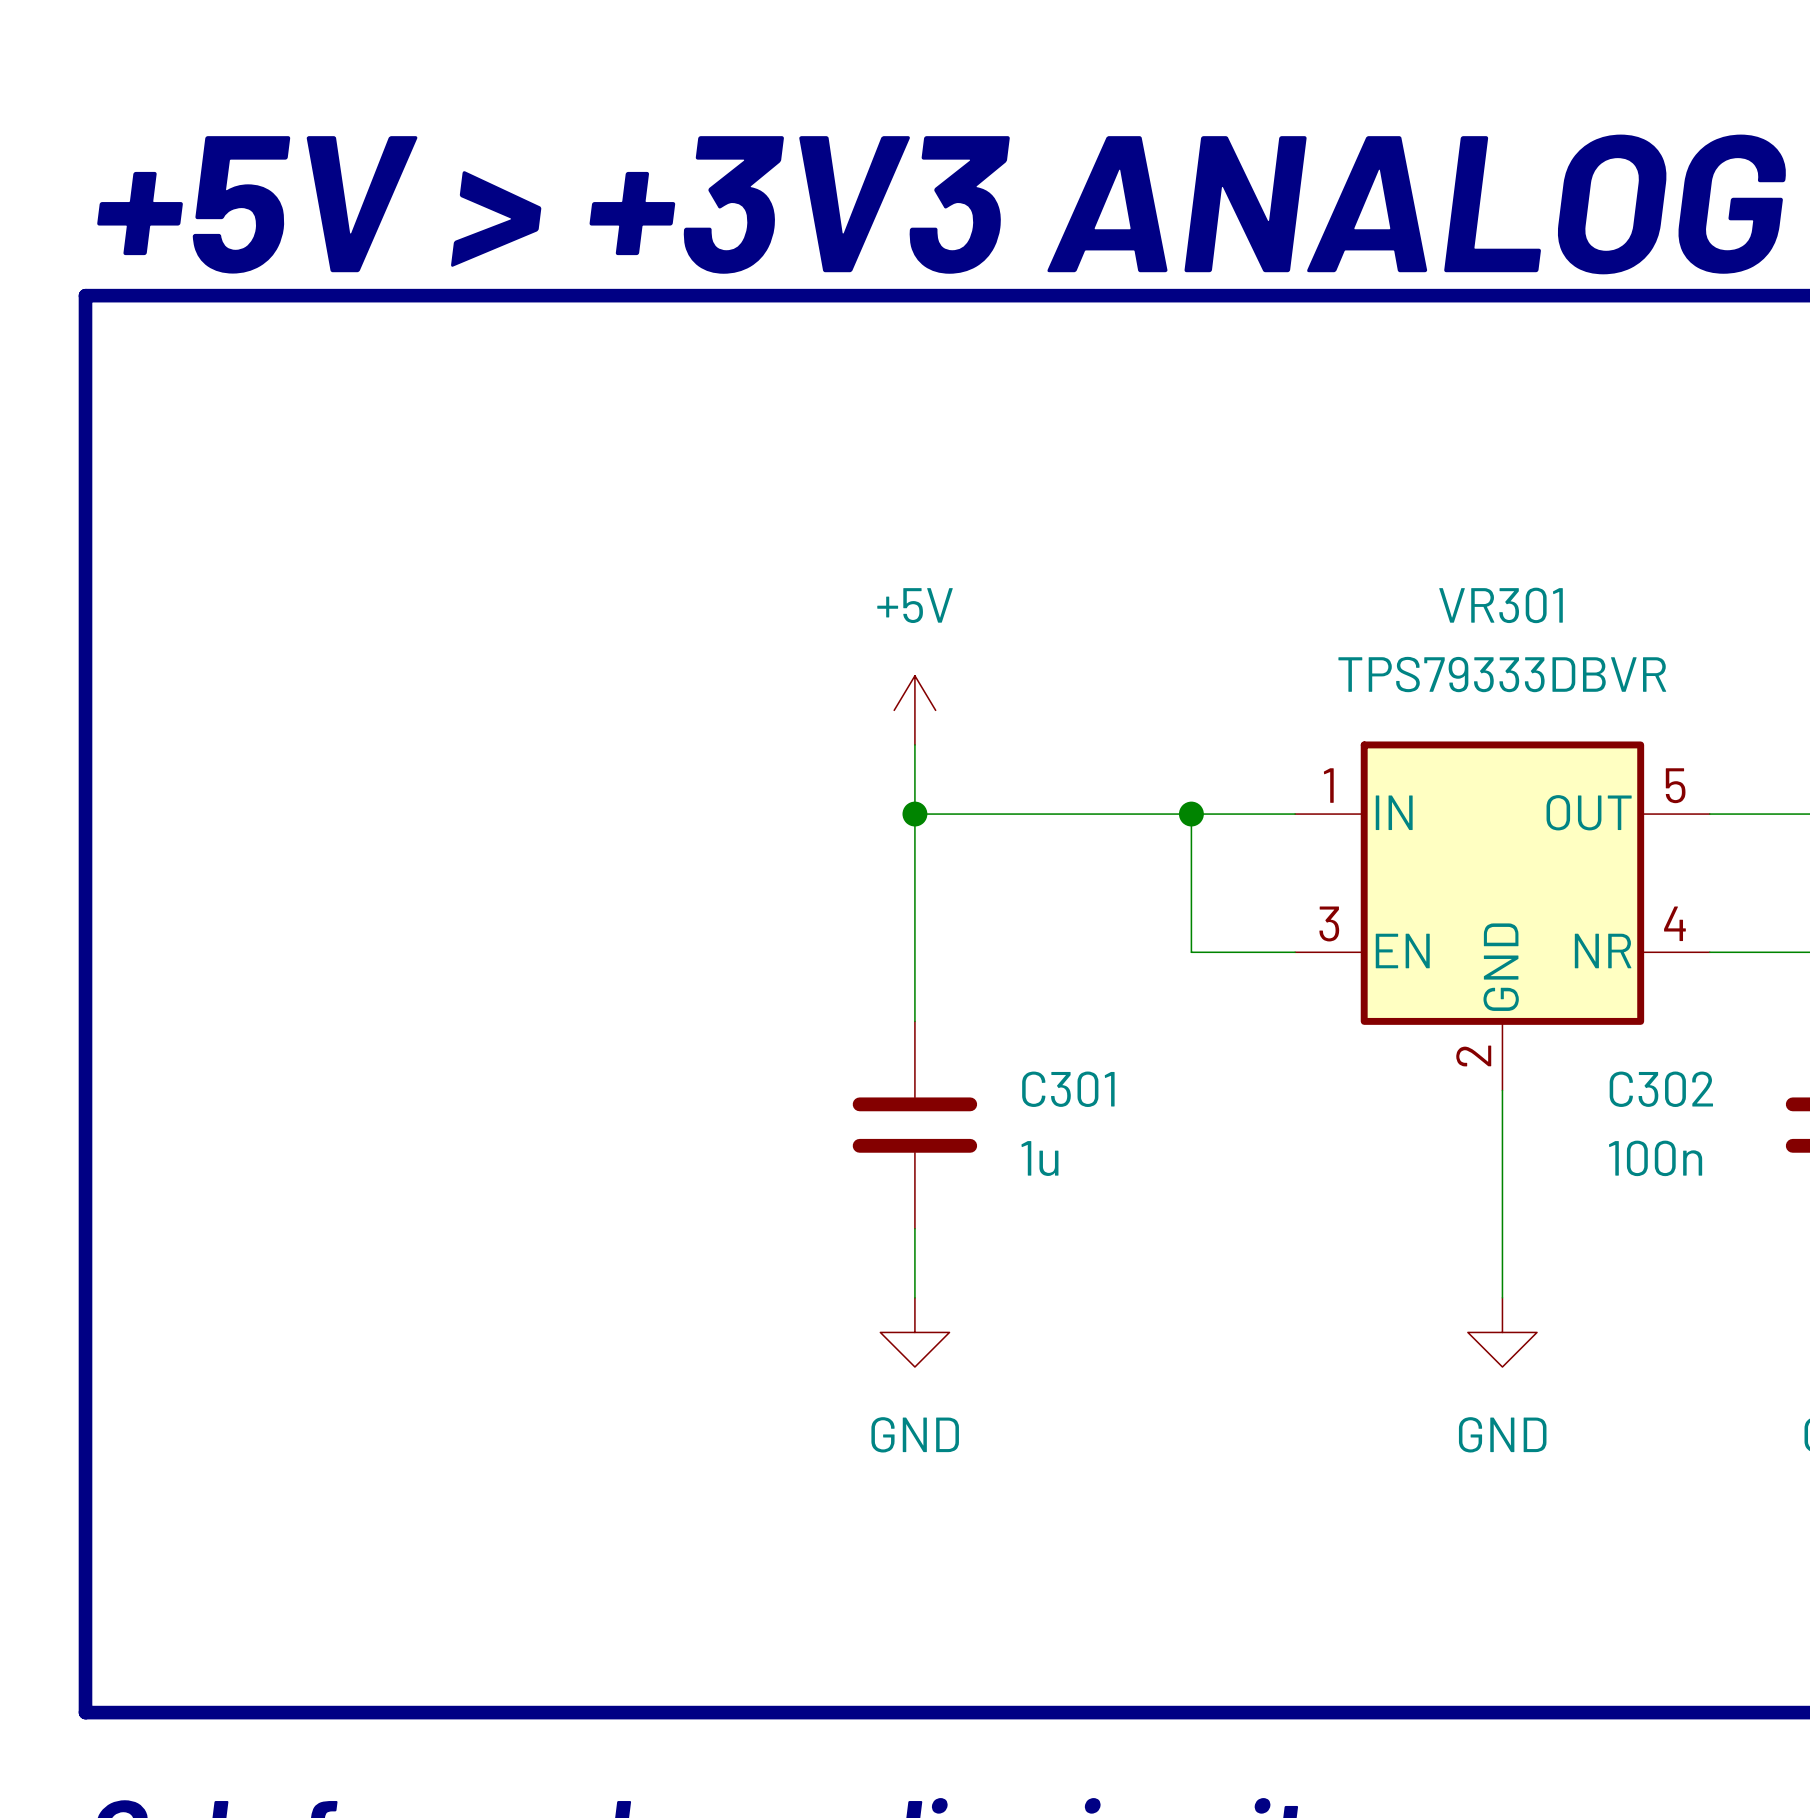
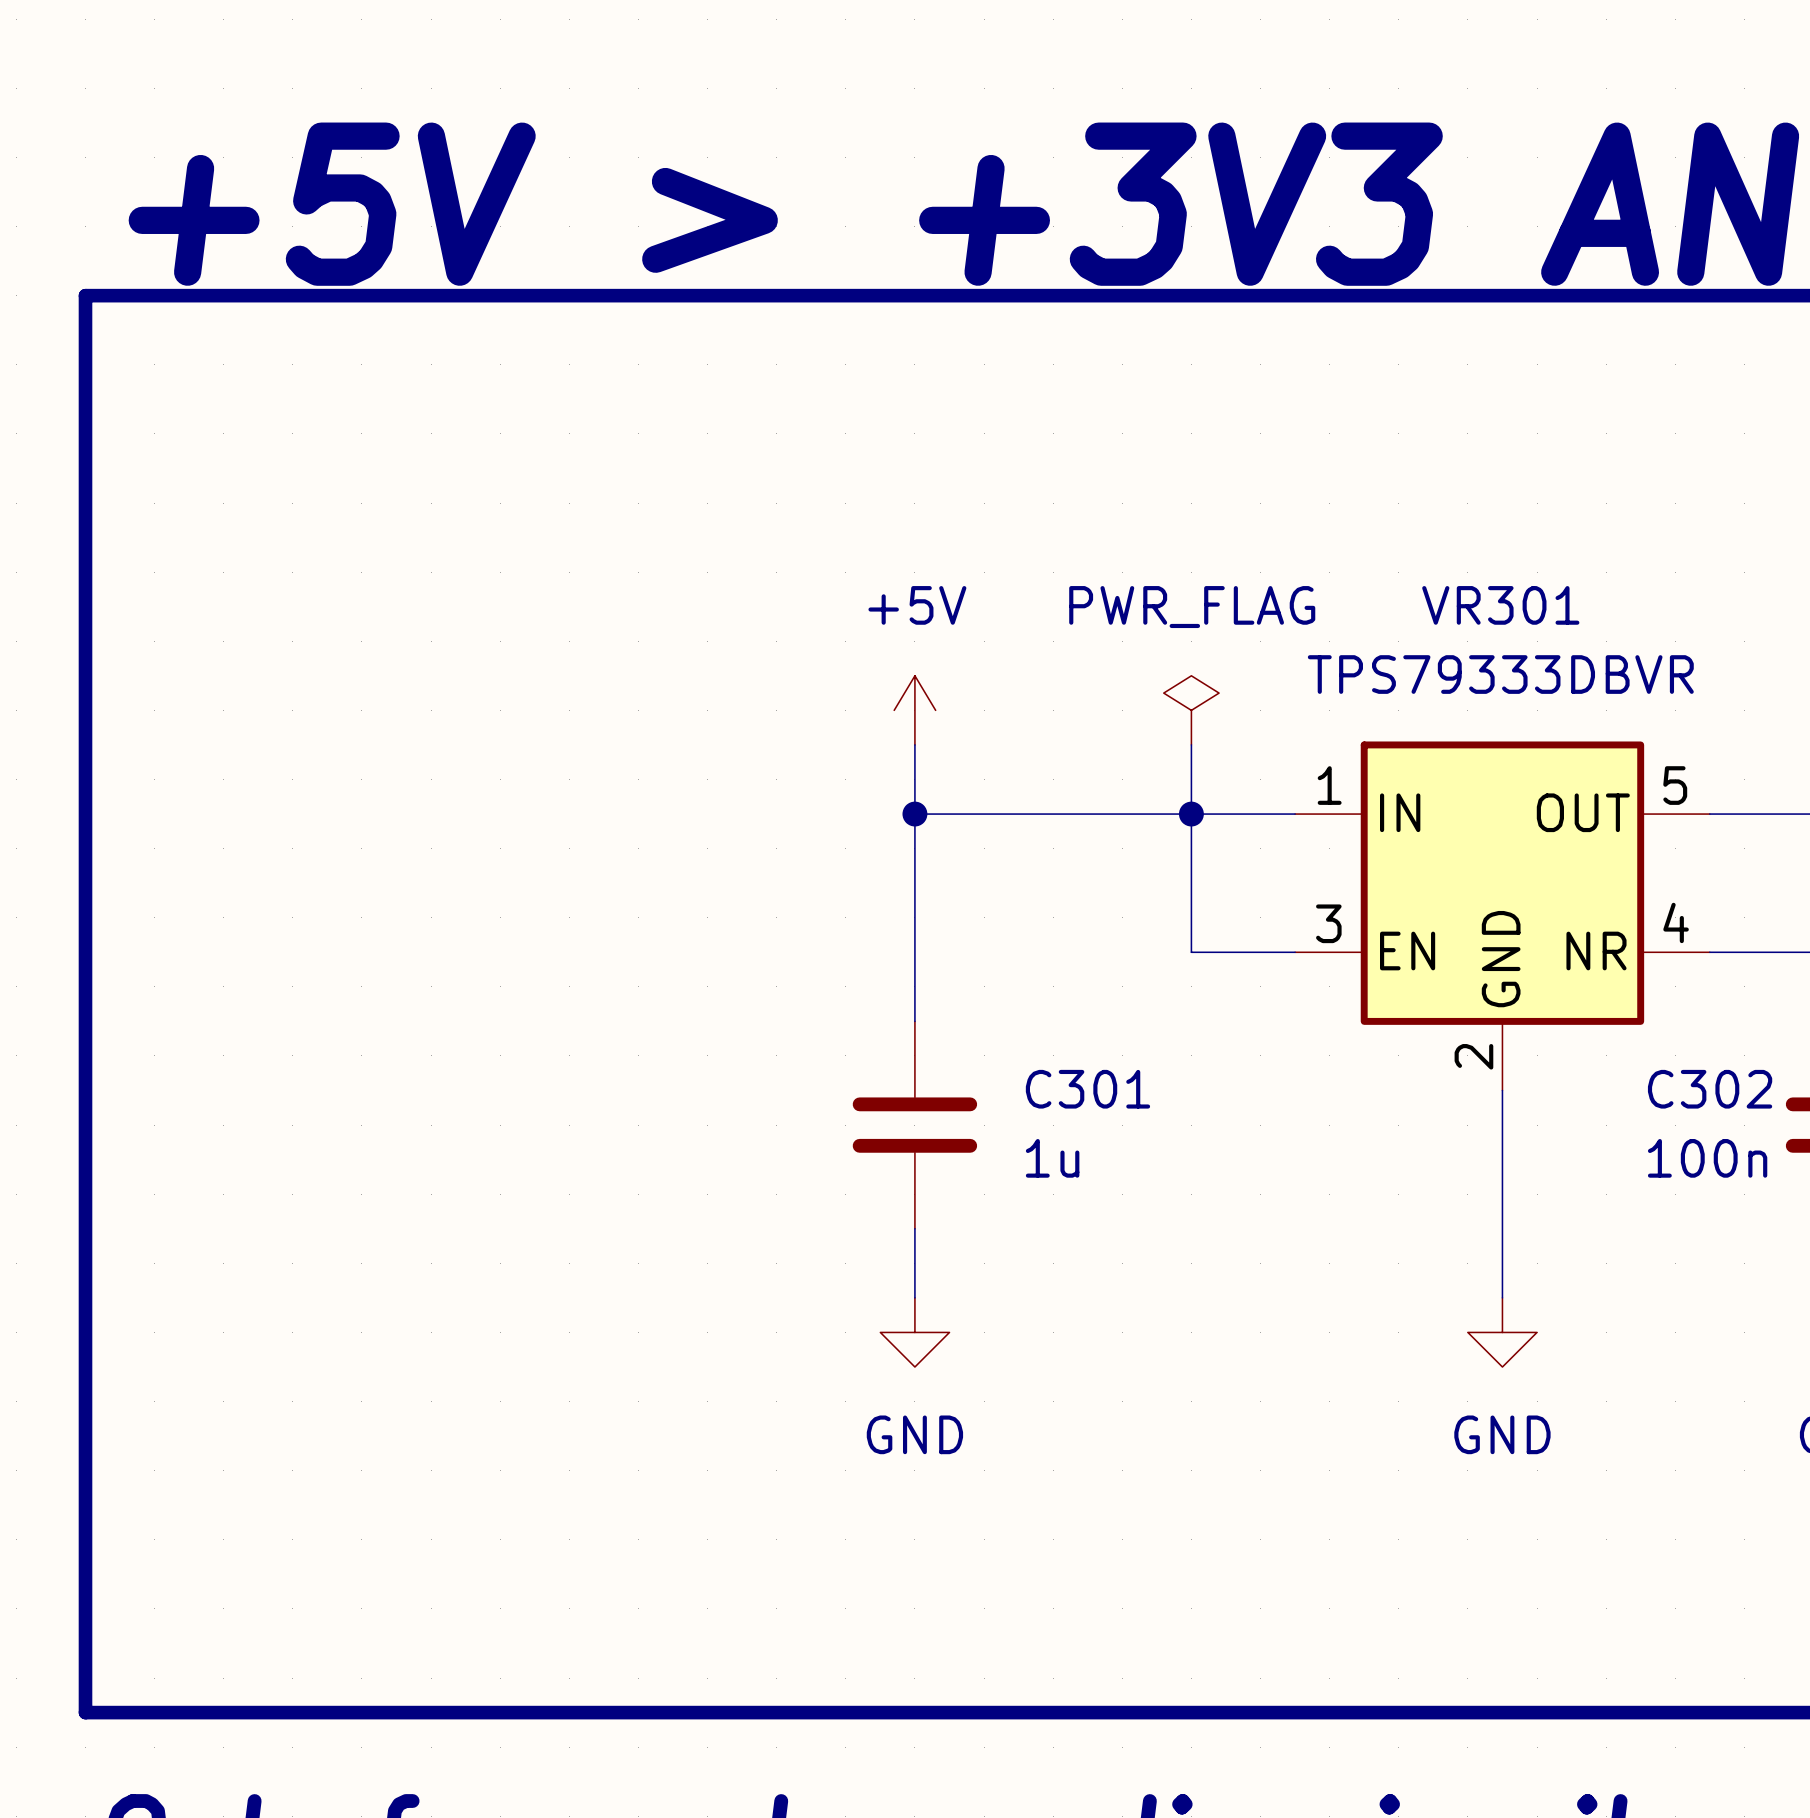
power symbol: none -> PWR_FLAG (1191, 710)
wire: none -> (1191, 744) (1191, 814)
C302 name position: C302 (1661, 1089) -> C302 (1710, 1089)
C302 value position: 100n (1655, 1158) -> 100n (1707, 1158)

